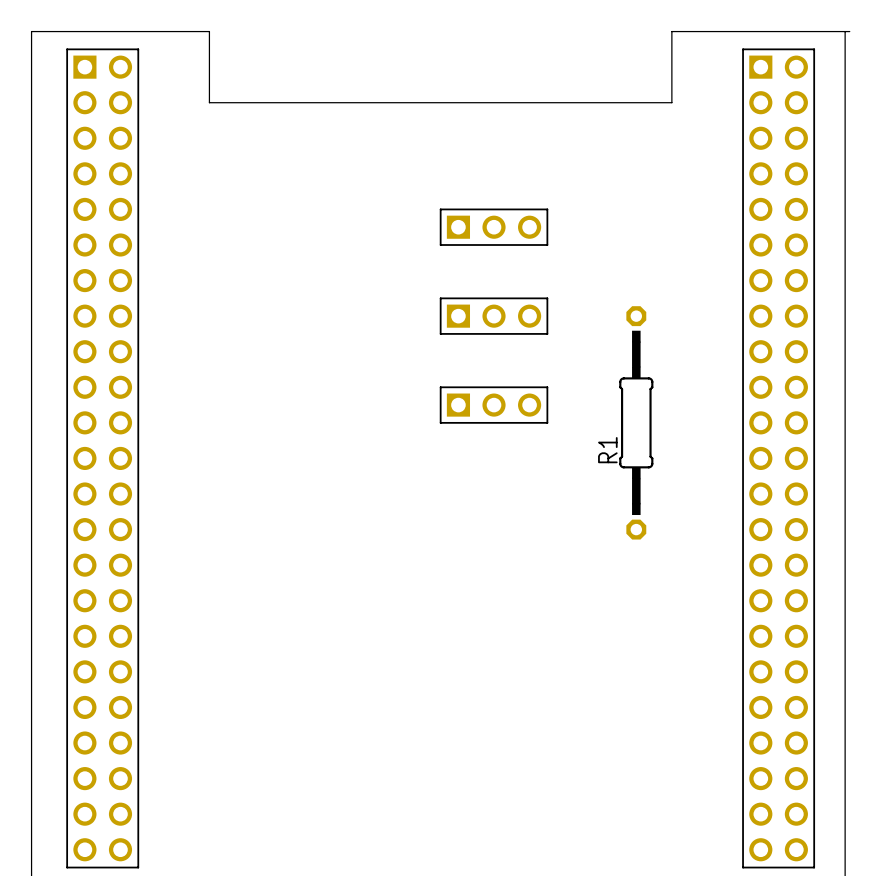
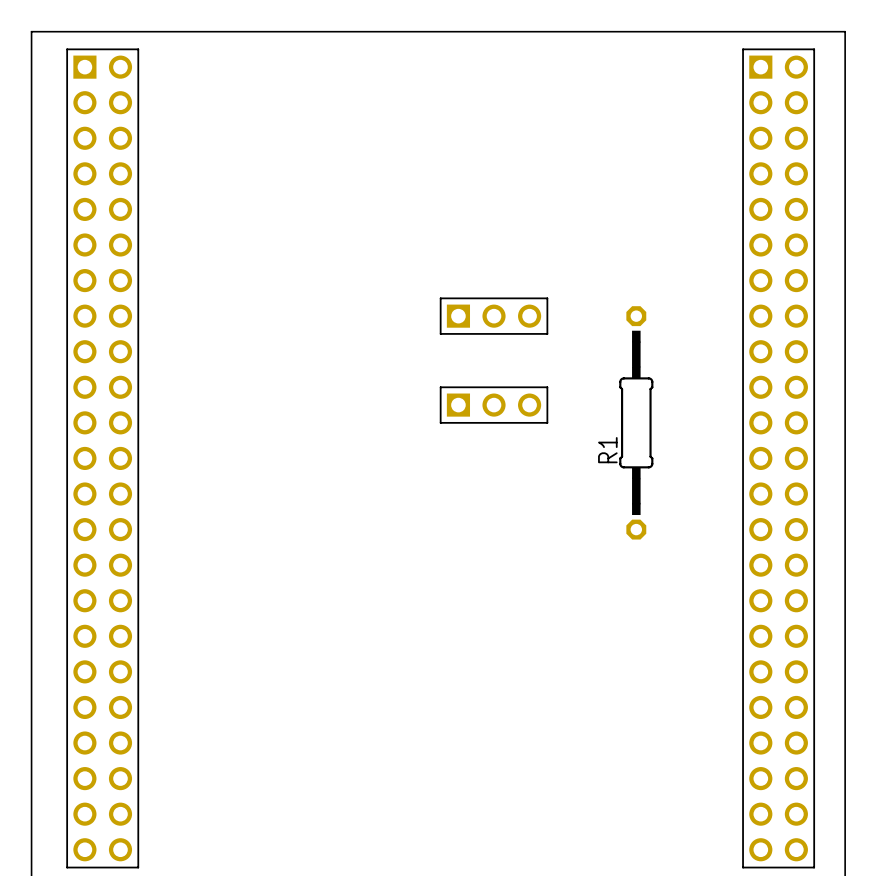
board edge: (31, 31) (209, 31) (209, 102) (671, 102) (671, 31) (849, 31) -> (31, 31) (845, 31)
part: (494, 227) -> none

